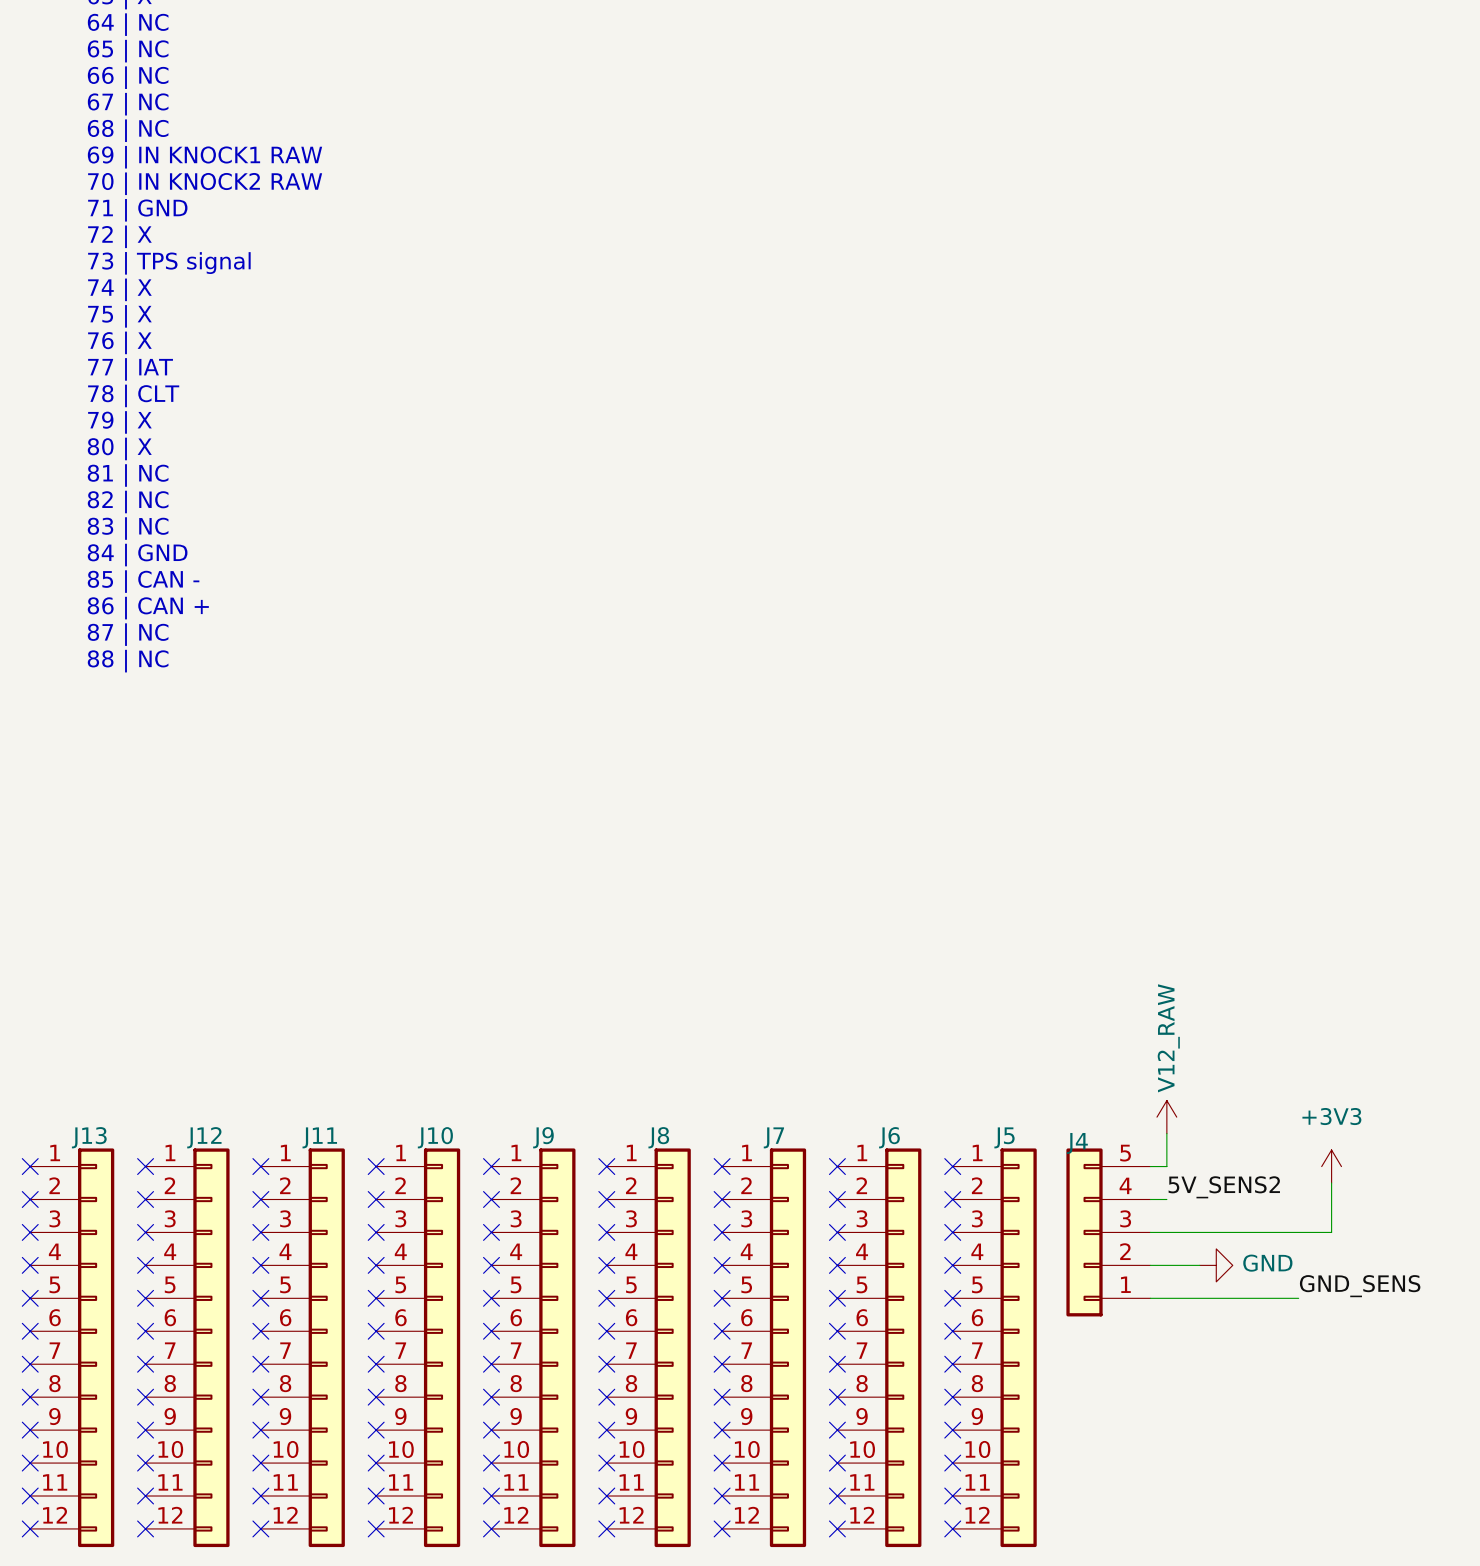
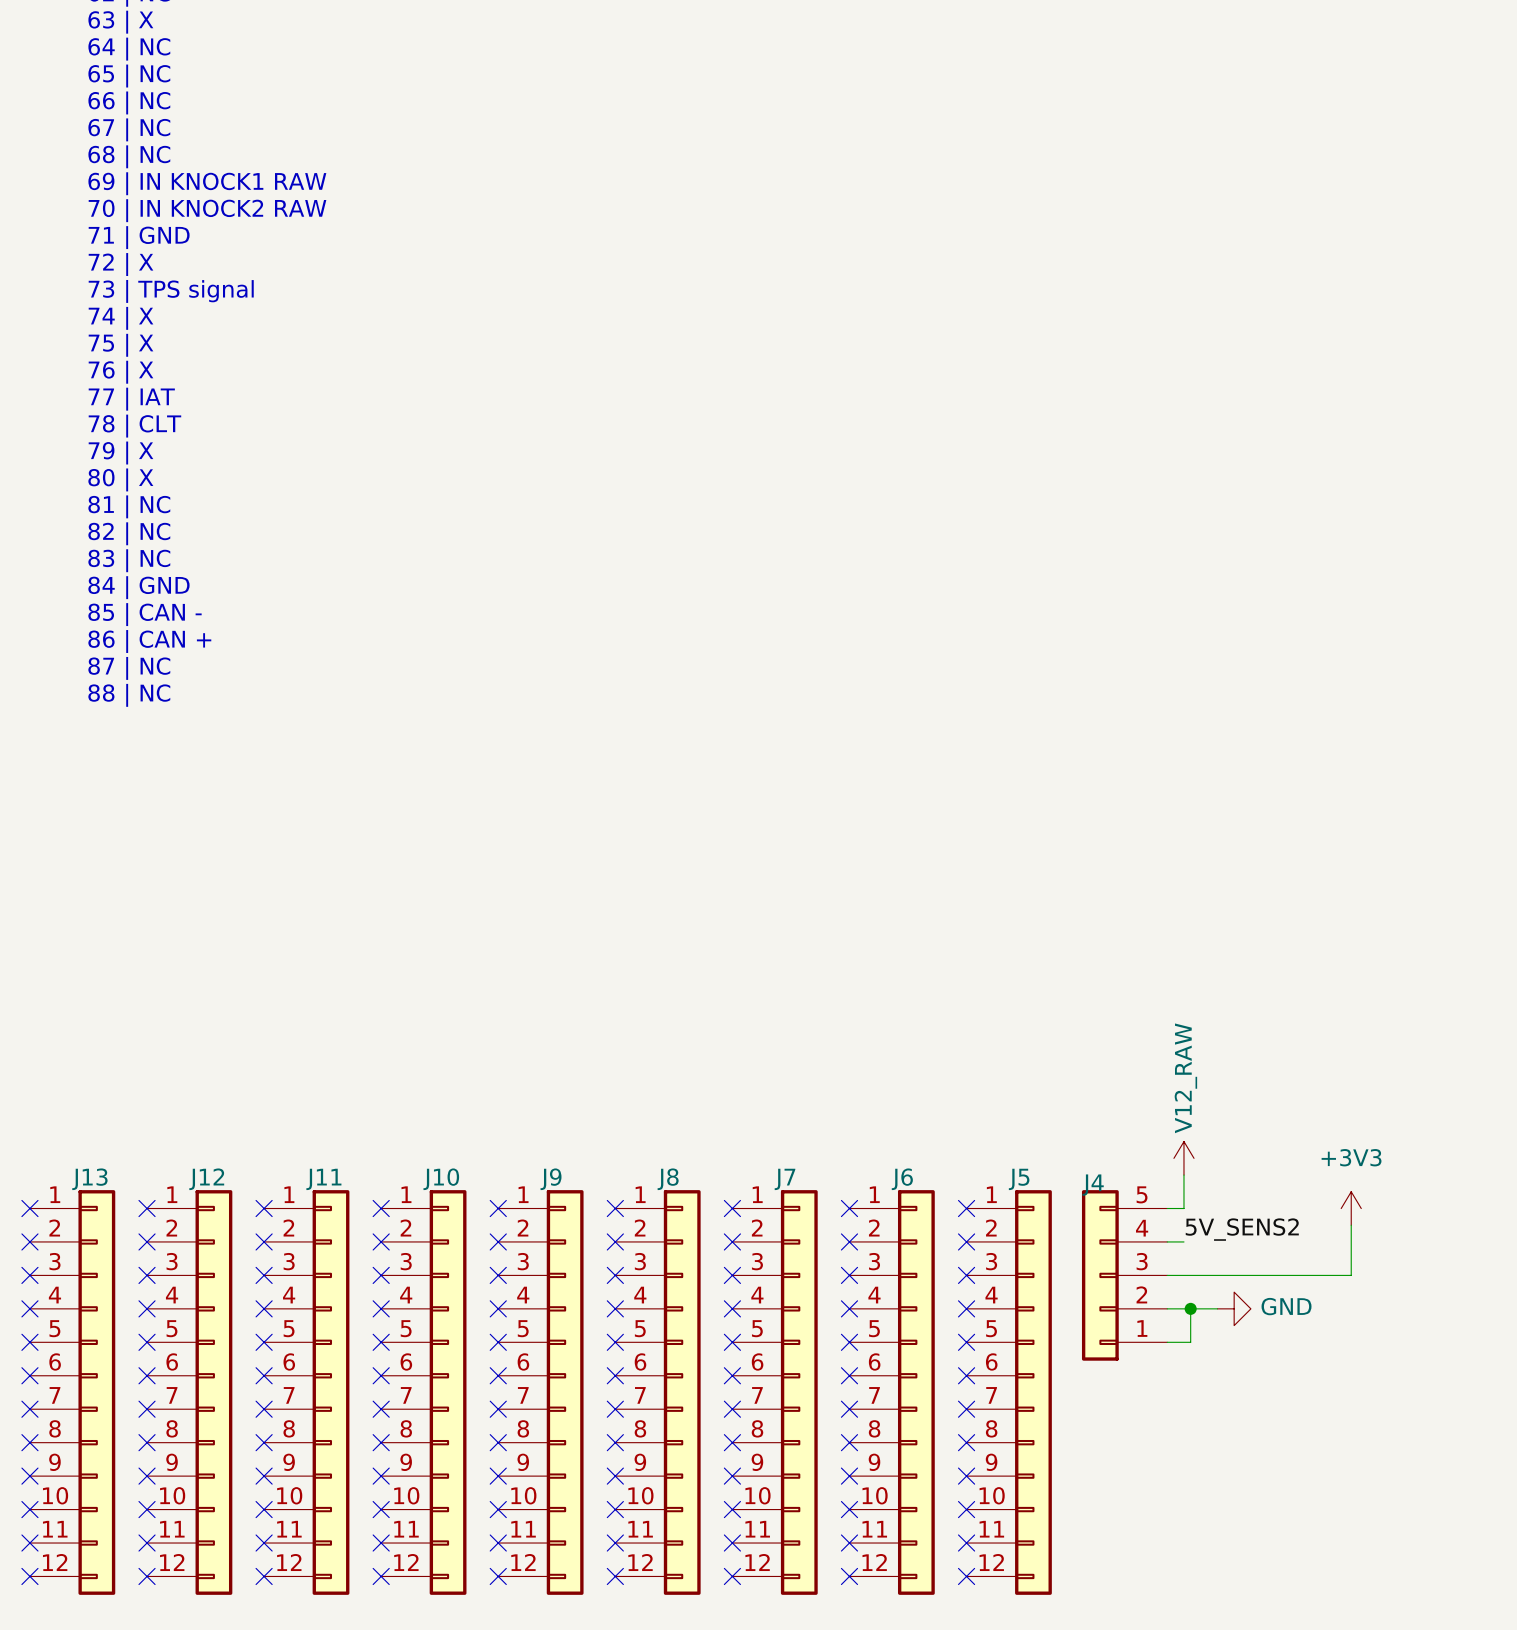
junction: none -> (1190, 1308)
label: GND_SENS (1360, 1286) -> none
wire: (1173, 1298) (1298, 1298) -> (1190, 1342) (1190, 1308)

